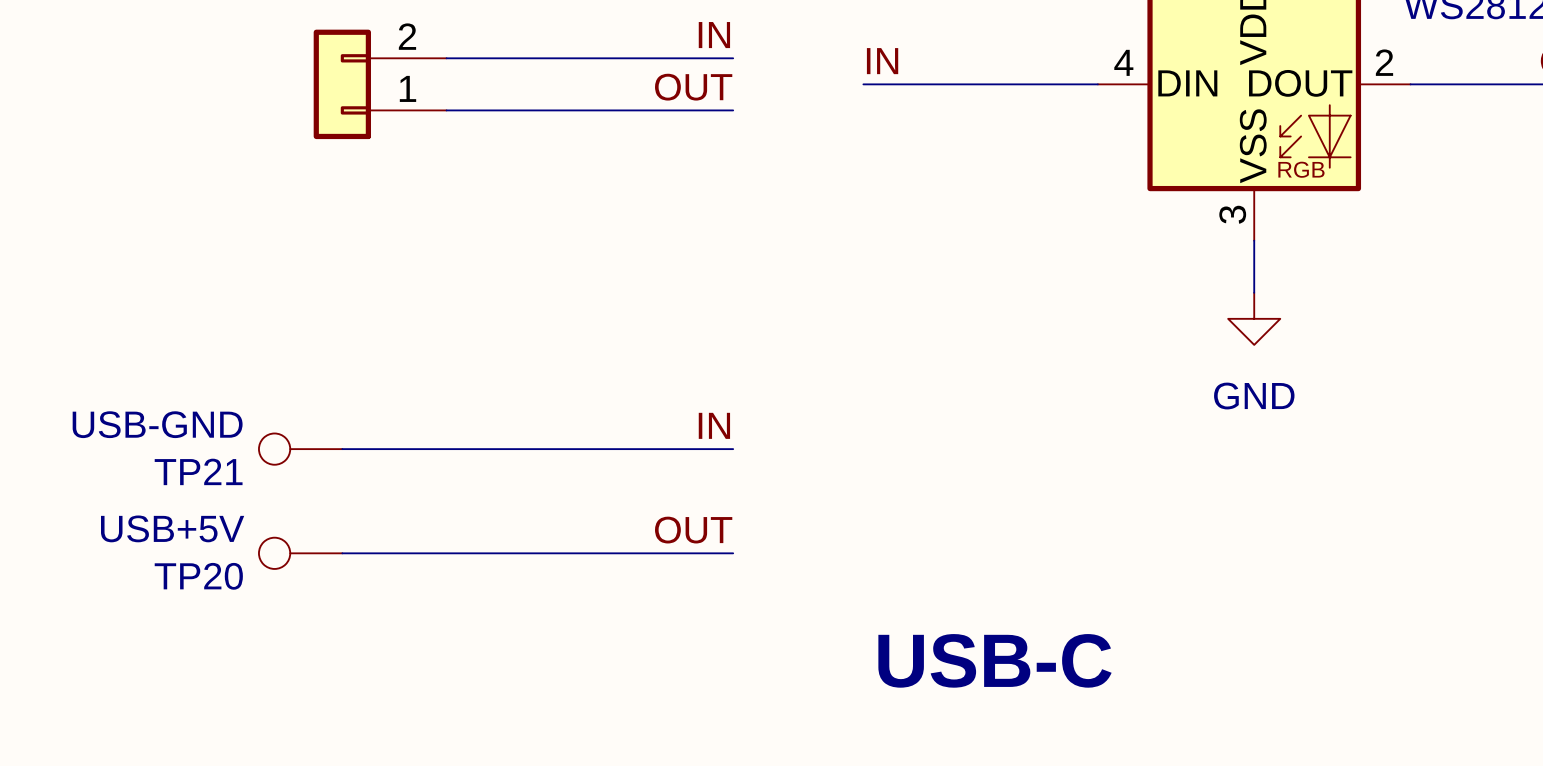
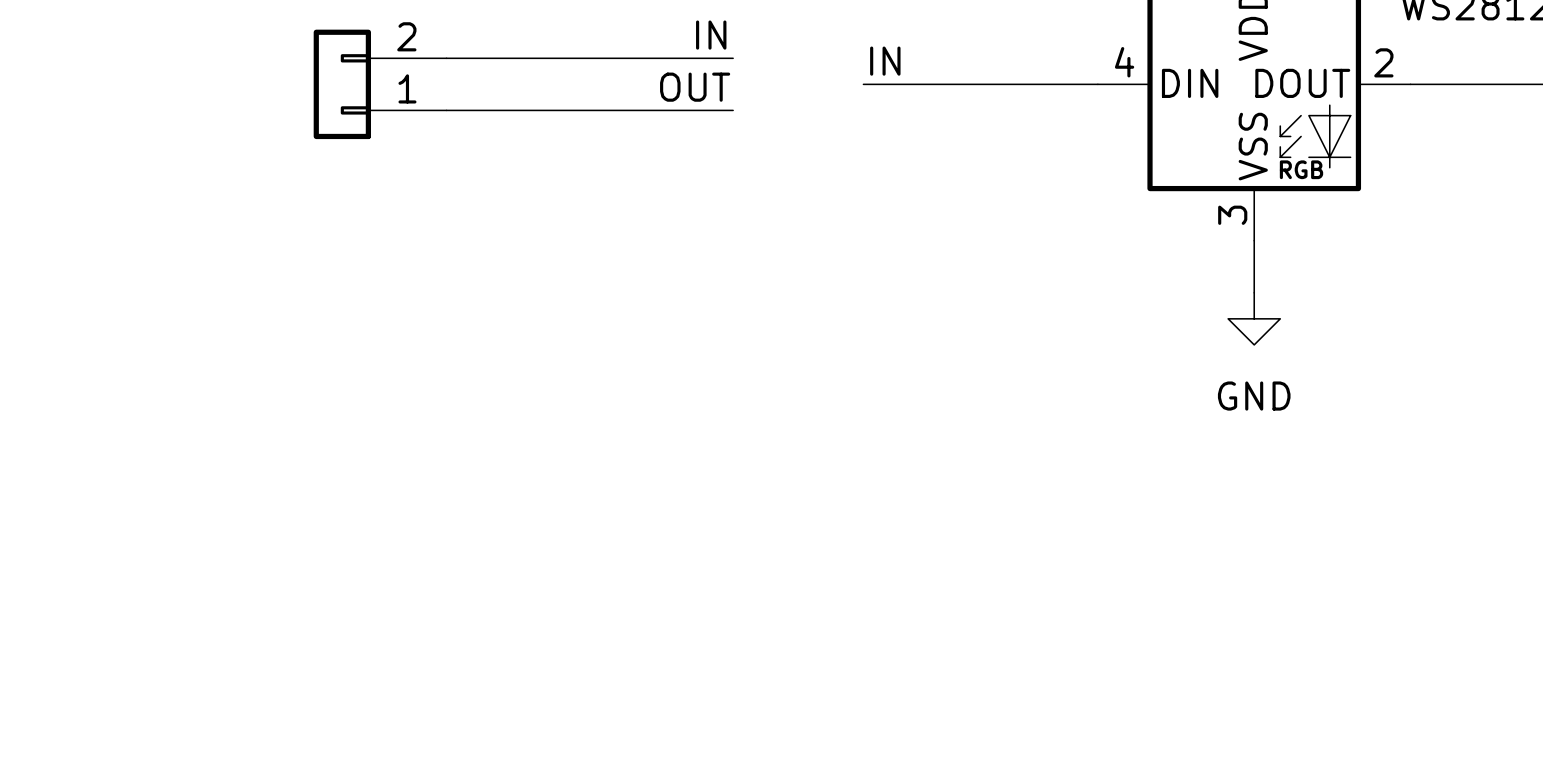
label: IN (714, 425) -> none
TP21: USB-GND (300, 449) -> none
wire: (342, 449) (733, 449) -> none
label: OUT (693, 530) -> none
TP20: USB+5V (300, 553) -> none
wire: (342, 553) (733, 553) -> none
text: USB-C (994, 660) -> none

